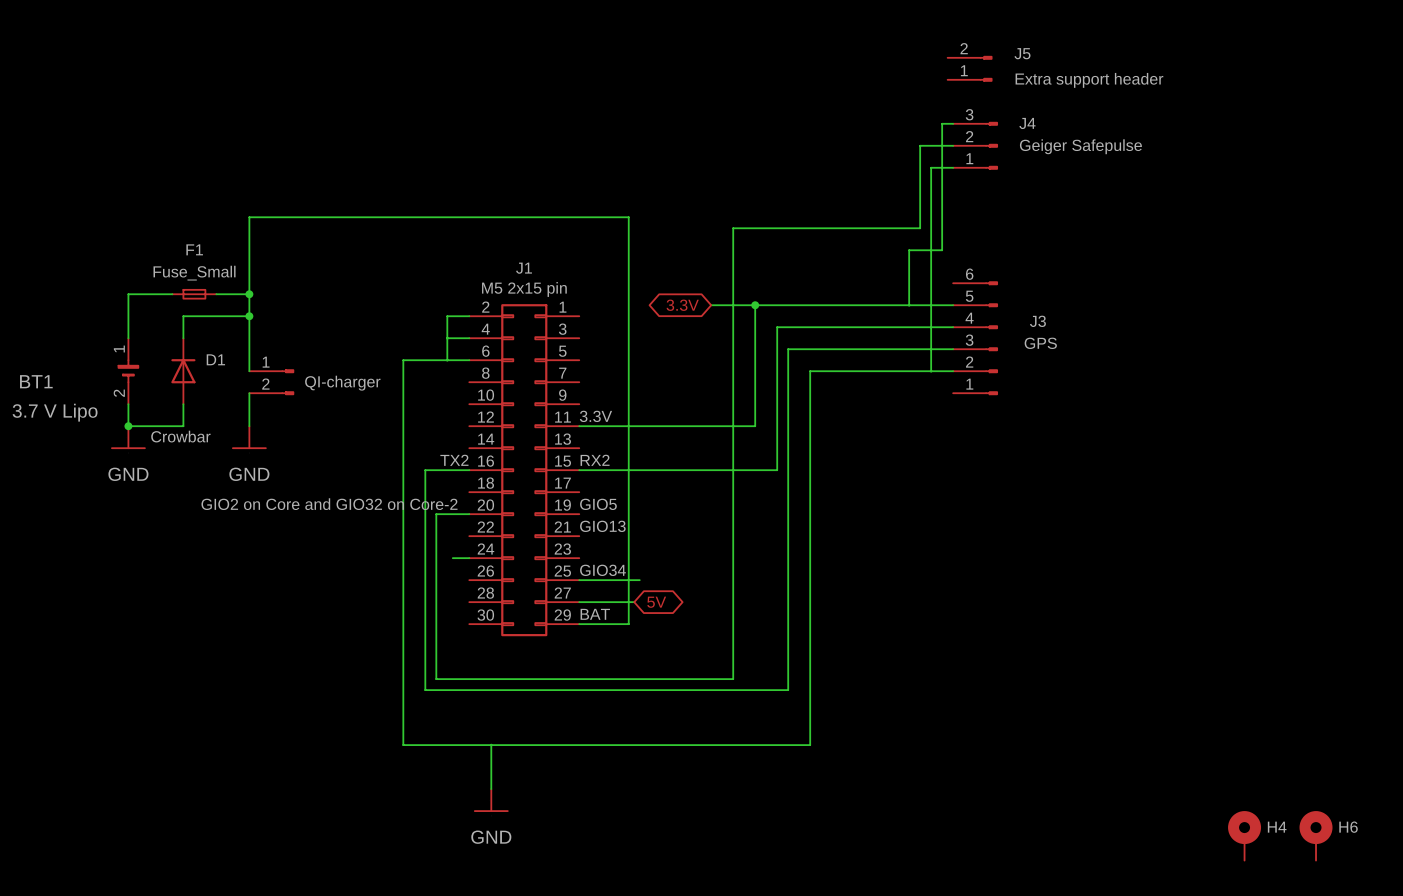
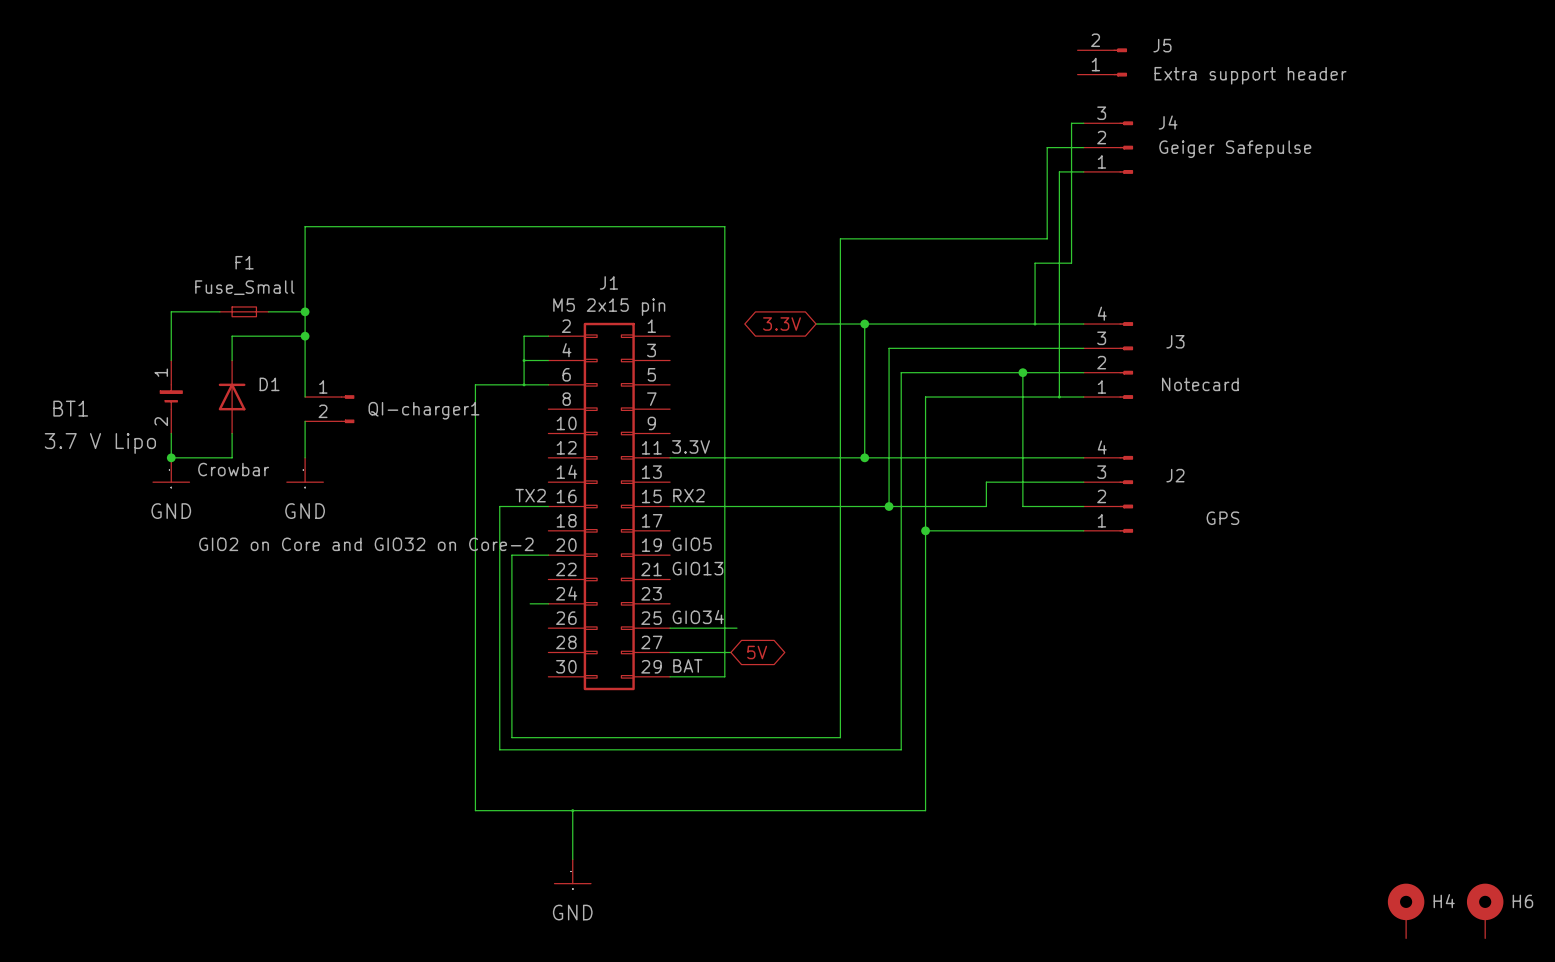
J3 symbol: [953, 281, 998, 395] -> [1083, 322, 1134, 399]
J3 value: GPS (1040, 343) -> Notecard (1200, 384)
wire: none -> (1022, 372) (1022, 506) (1083, 506)
junction: none -> (1022, 372)
QI-charger name: QI-charger (342, 383) -> QI-charger1 (423, 410)
wire: none -> (864, 457) (1083, 457)
junction: none -> (864, 457)
wire: none -> (1083, 482) (986, 482) (986, 506) (889, 506)
J2: none -> GPS (1108, 494)
junction: none -> (889, 506)
wire: none -> (925, 530) (1083, 530)
junction: none -> (925, 530)

